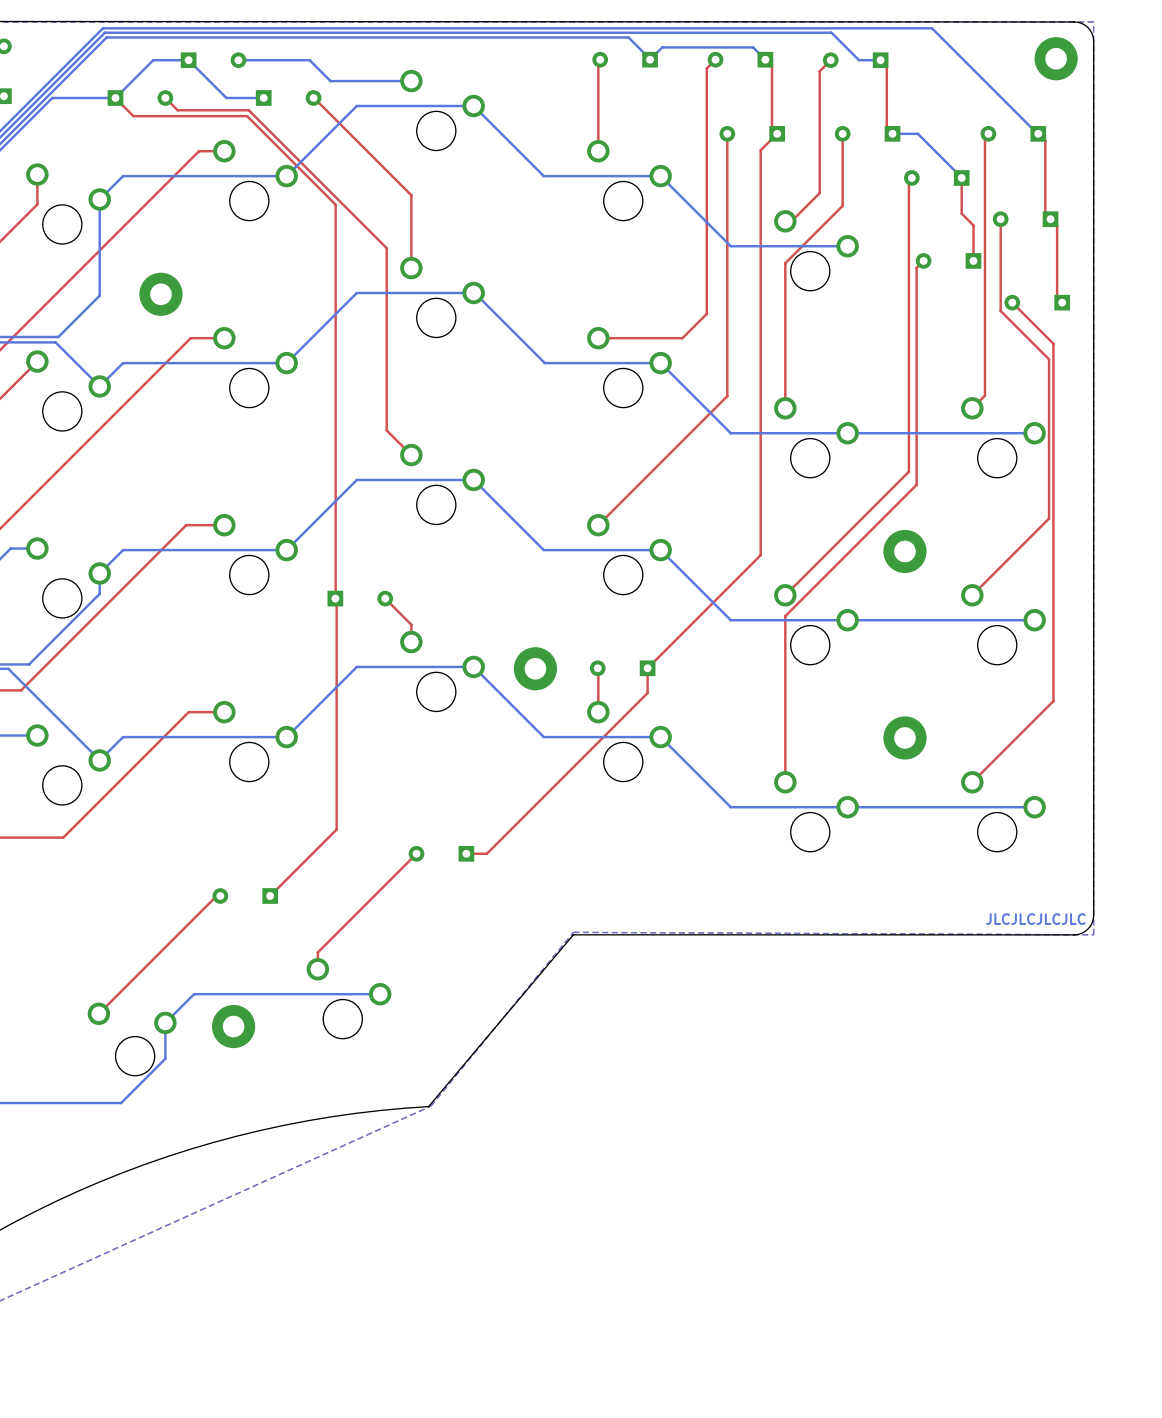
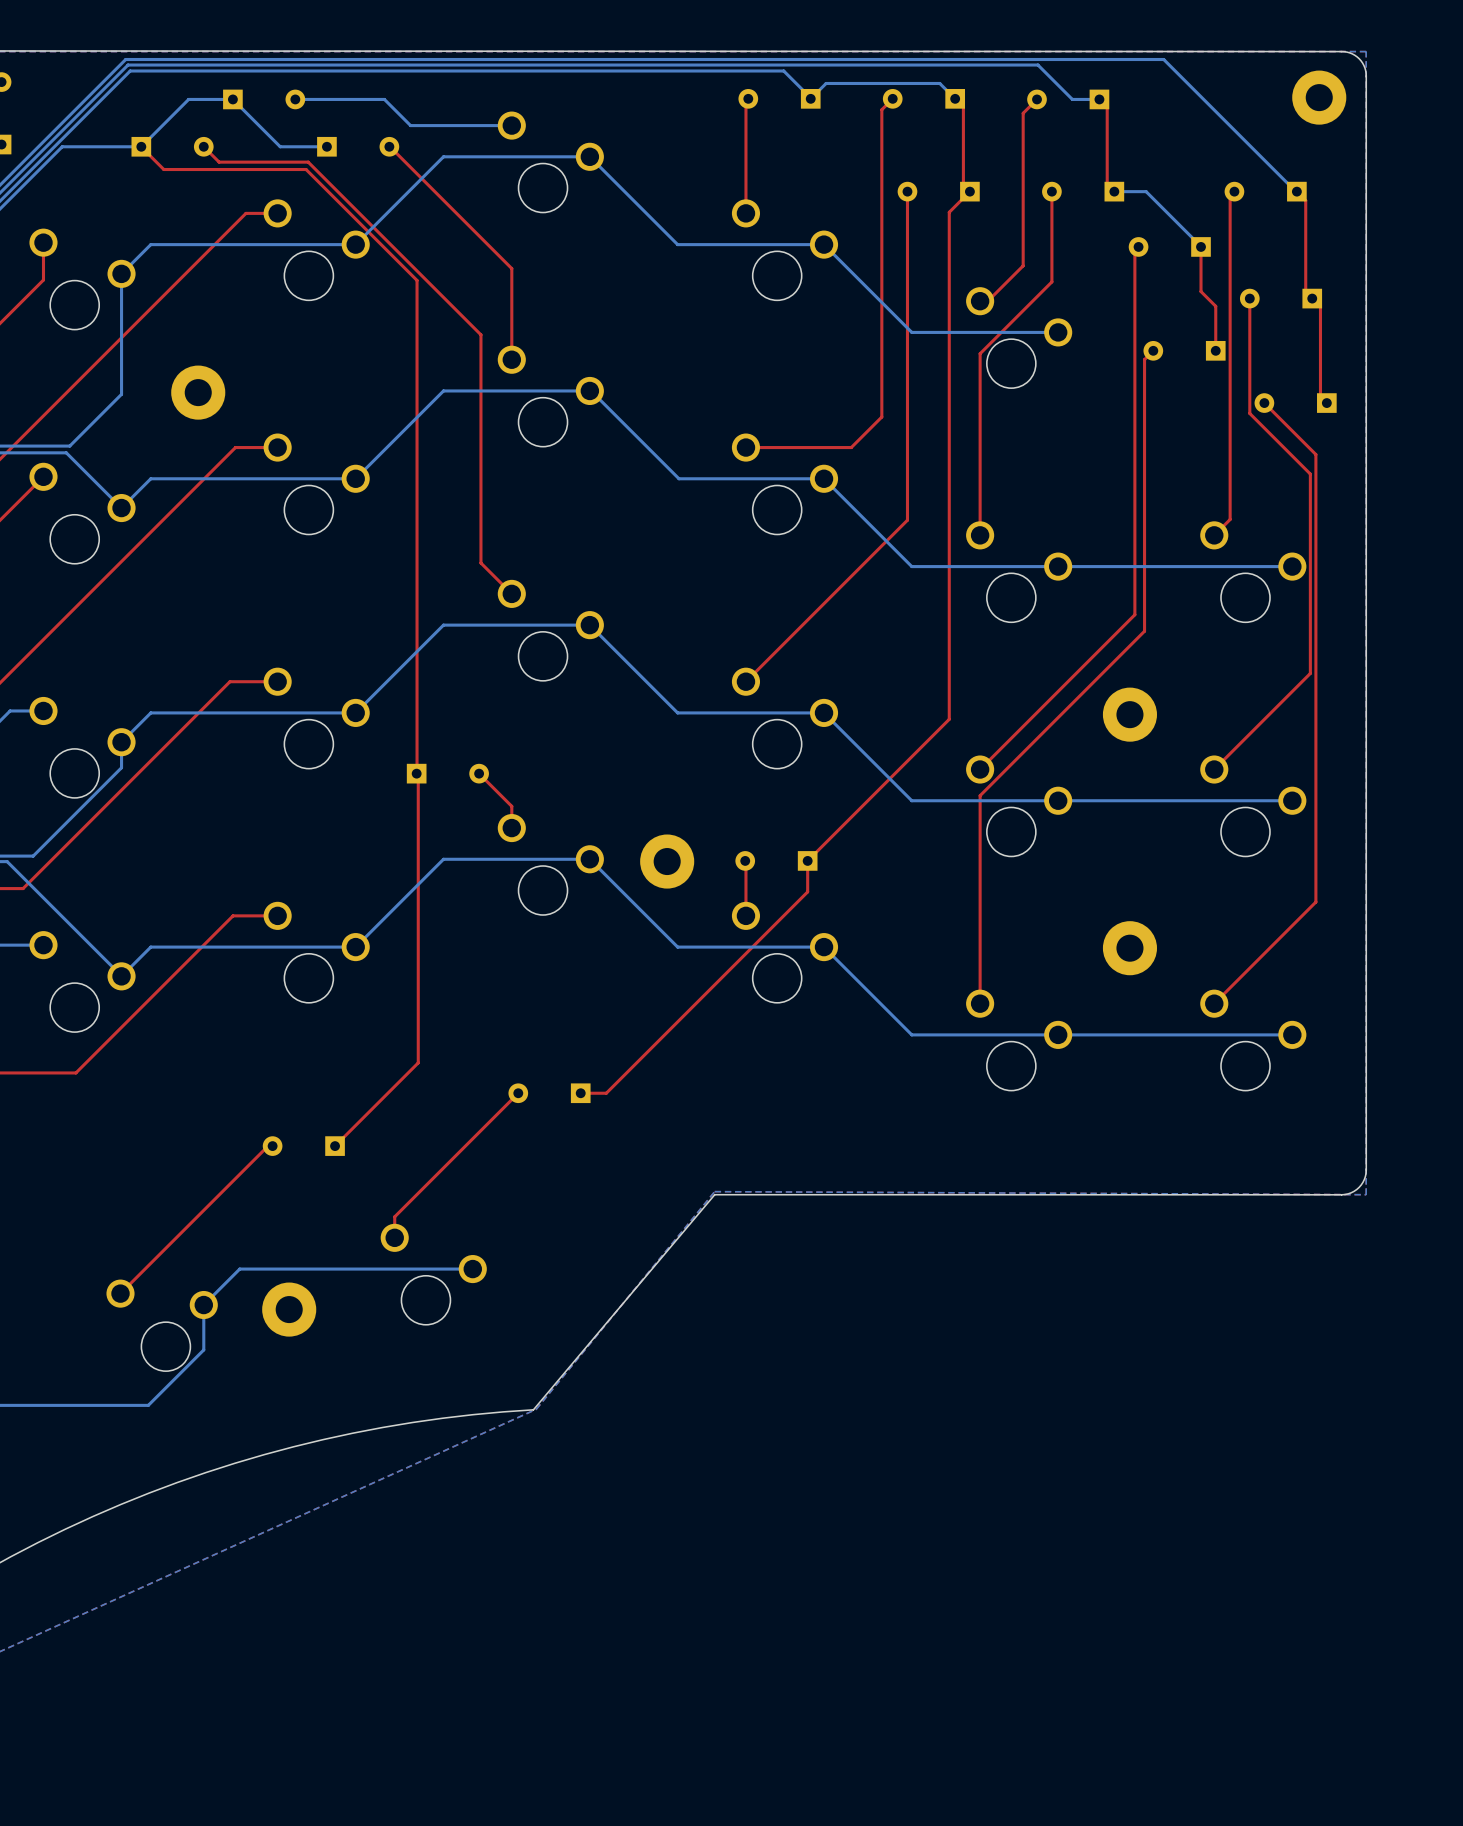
text: JLCJLCJLCJLC (1035, 919) -> none

